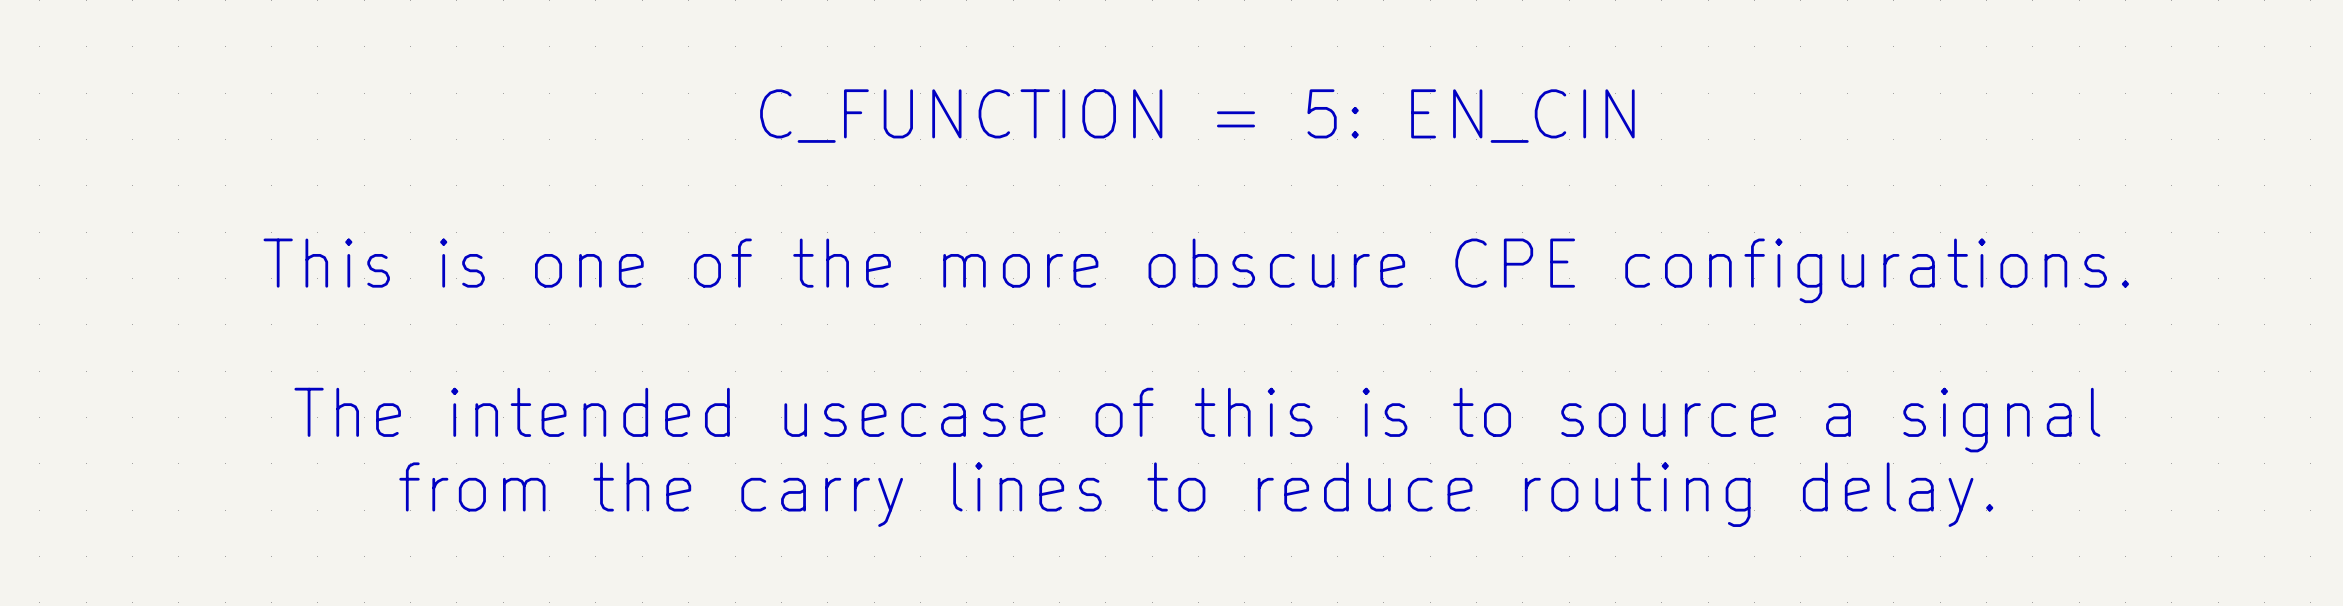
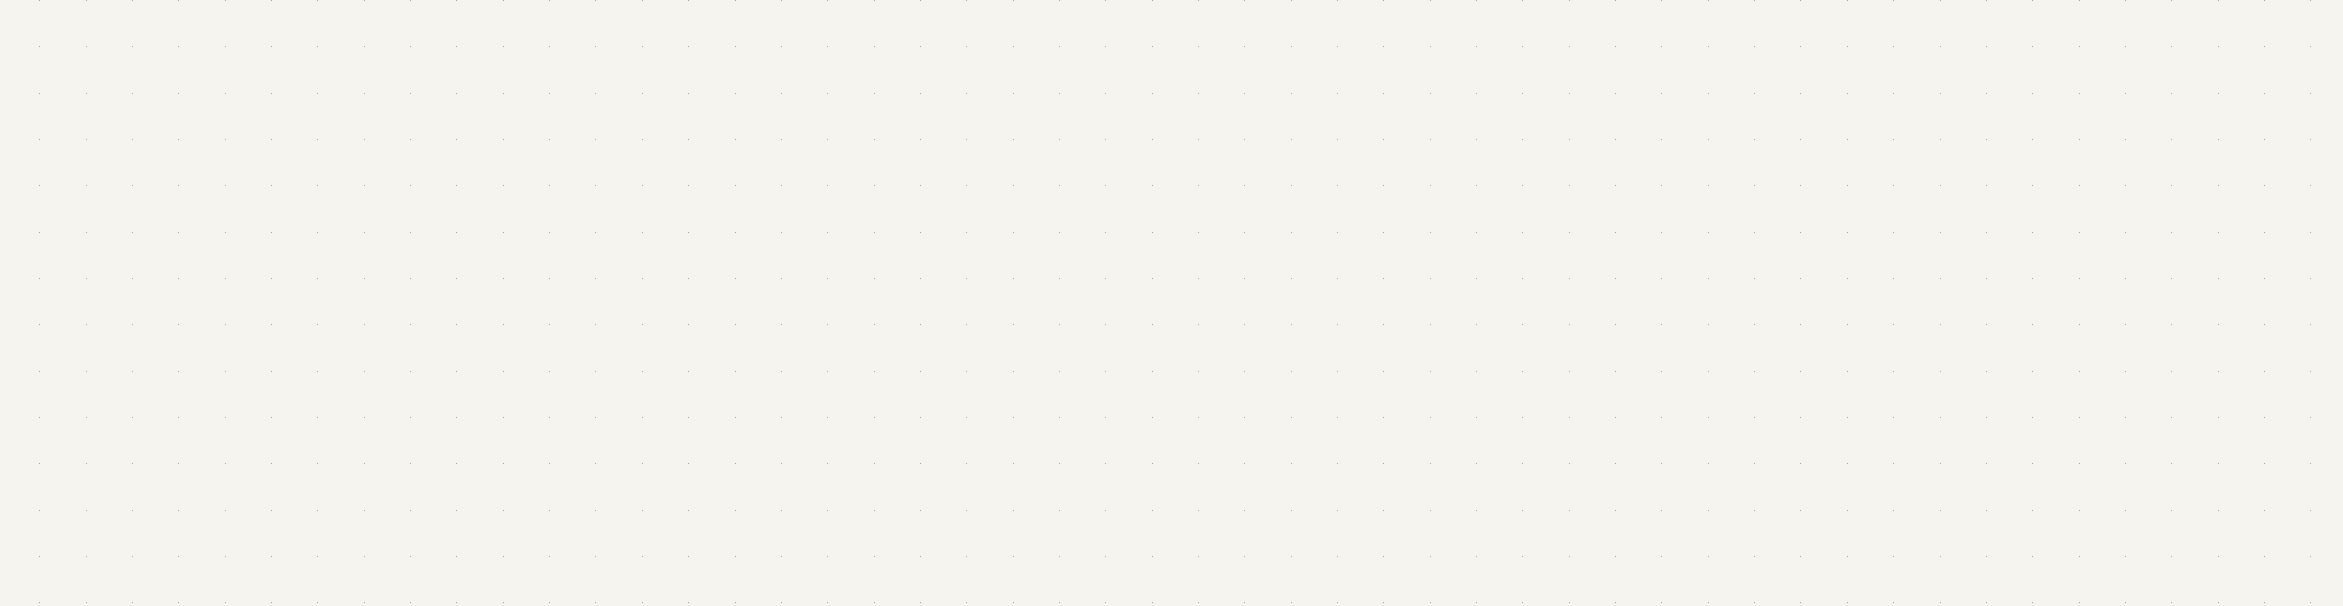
text: C_FUNCTION = 5: EN_CIN (1197, 116) -> none
text: This is one of the more obscure CPE configurations. (1196, 270) -> none
text: The intended usecase of this is to source a signal (1197, 420) -> none
text: from the carry lines to reduce routing delay. (1196, 494) -> none

